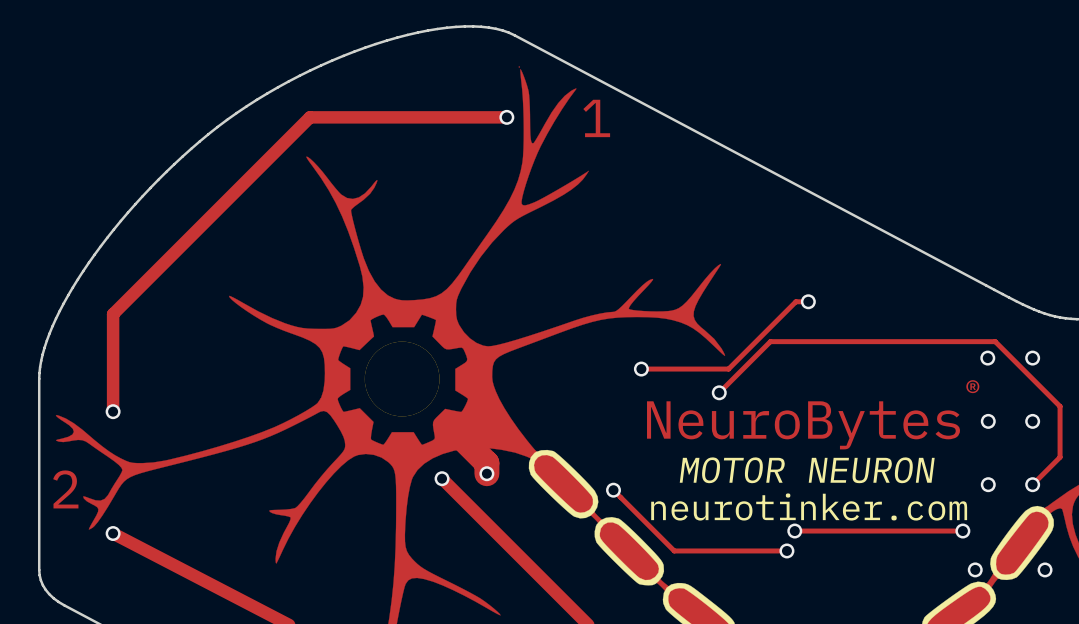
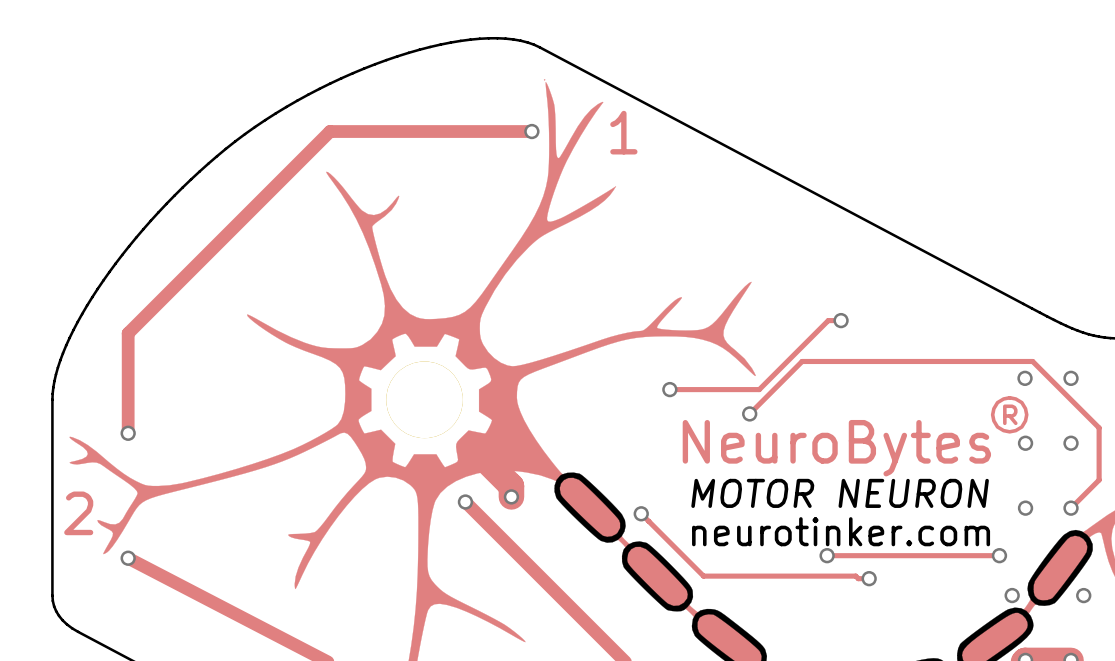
track: none -> (819, 576) (855, 576) (858, 578) (869, 578)
via position: (786, 550) -> (869, 578)

